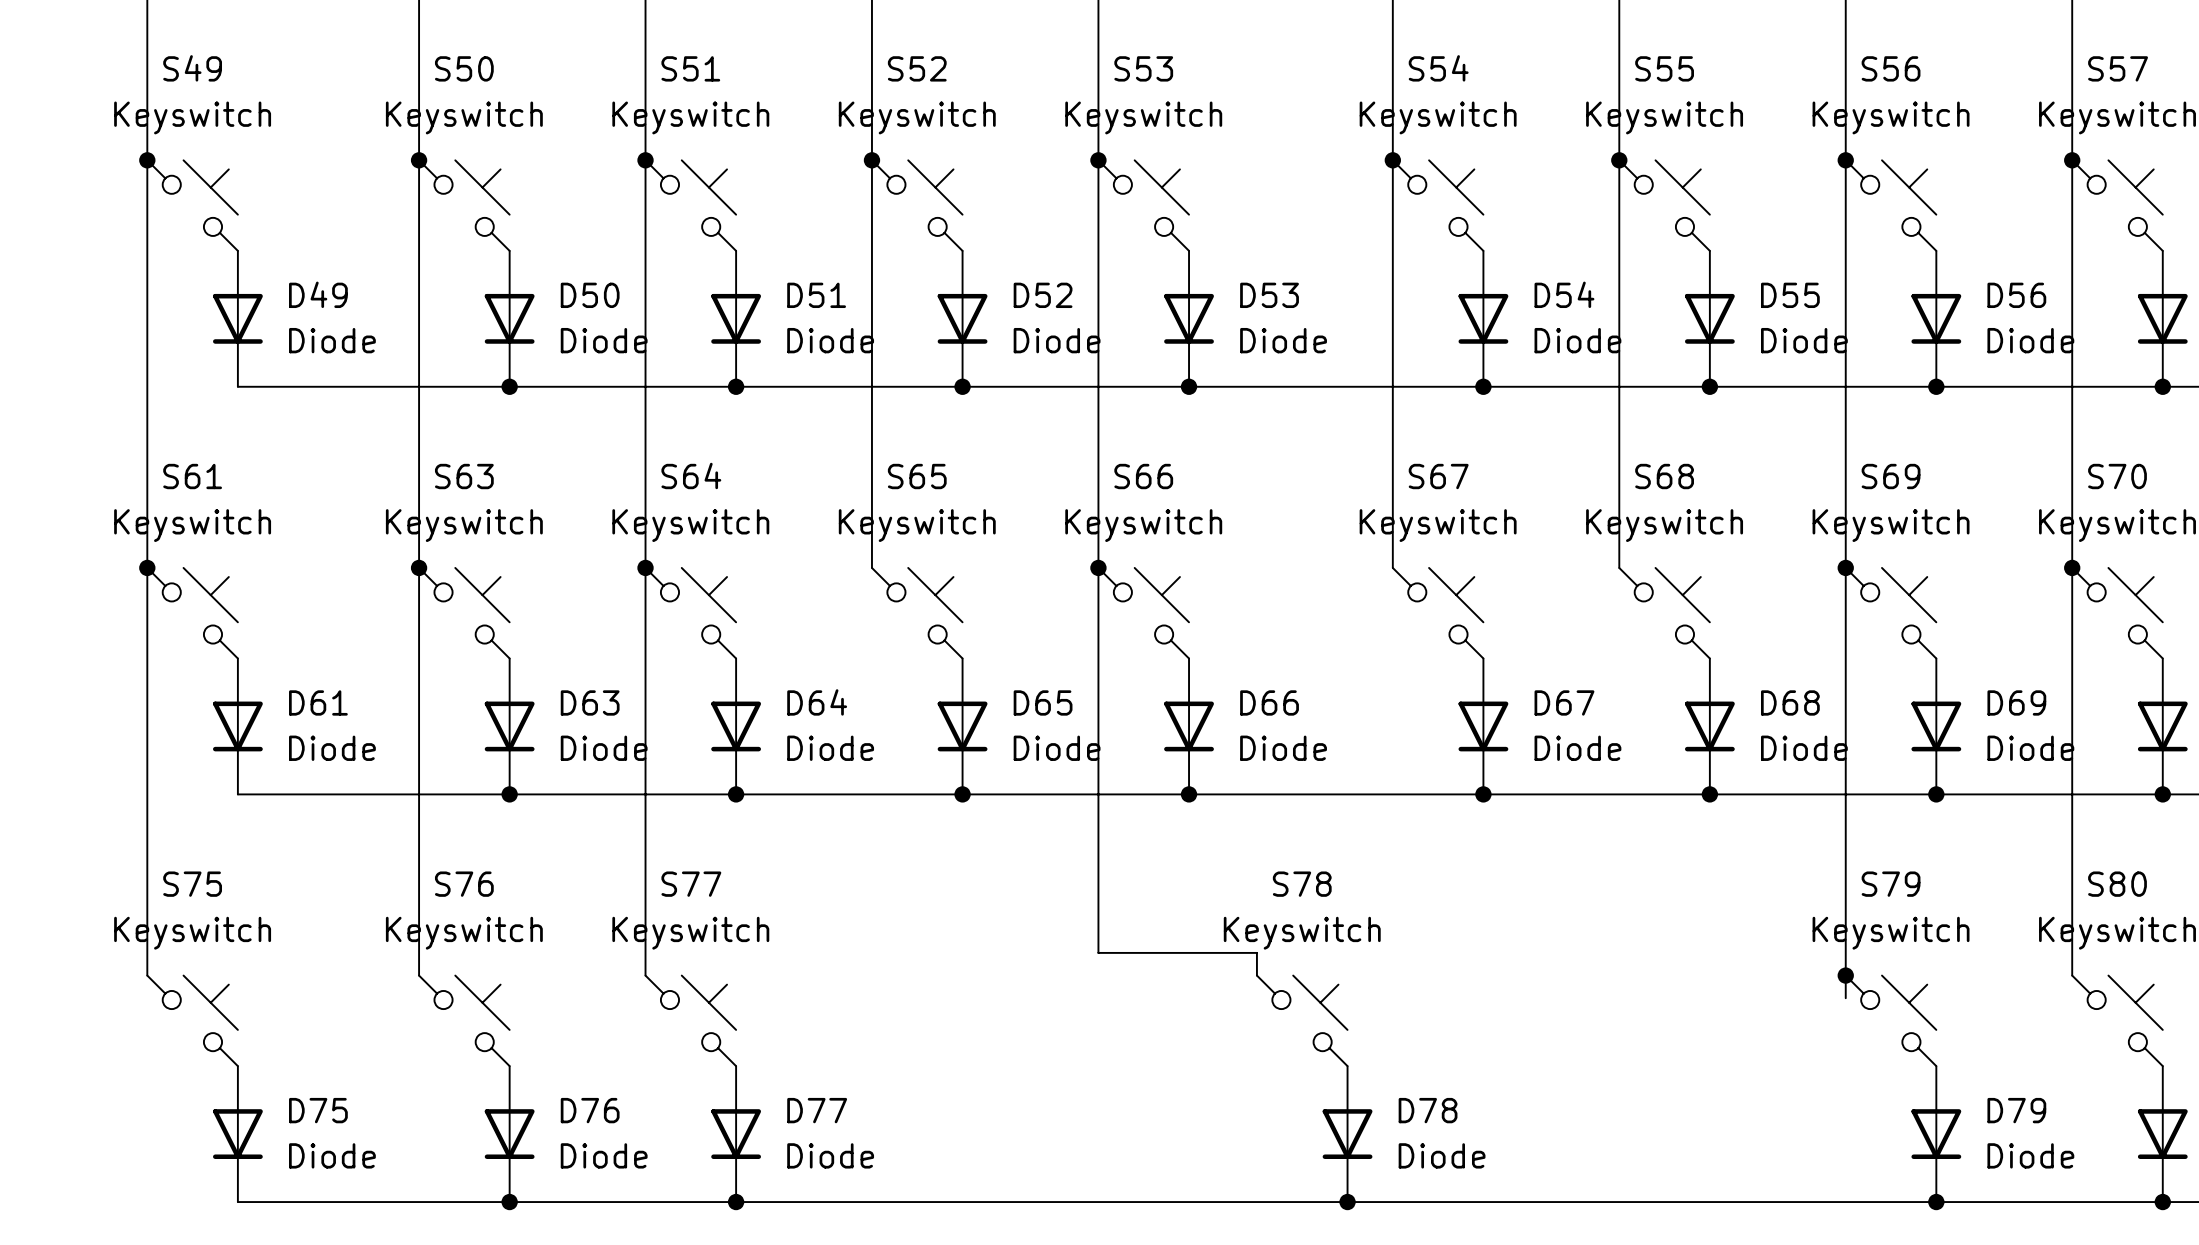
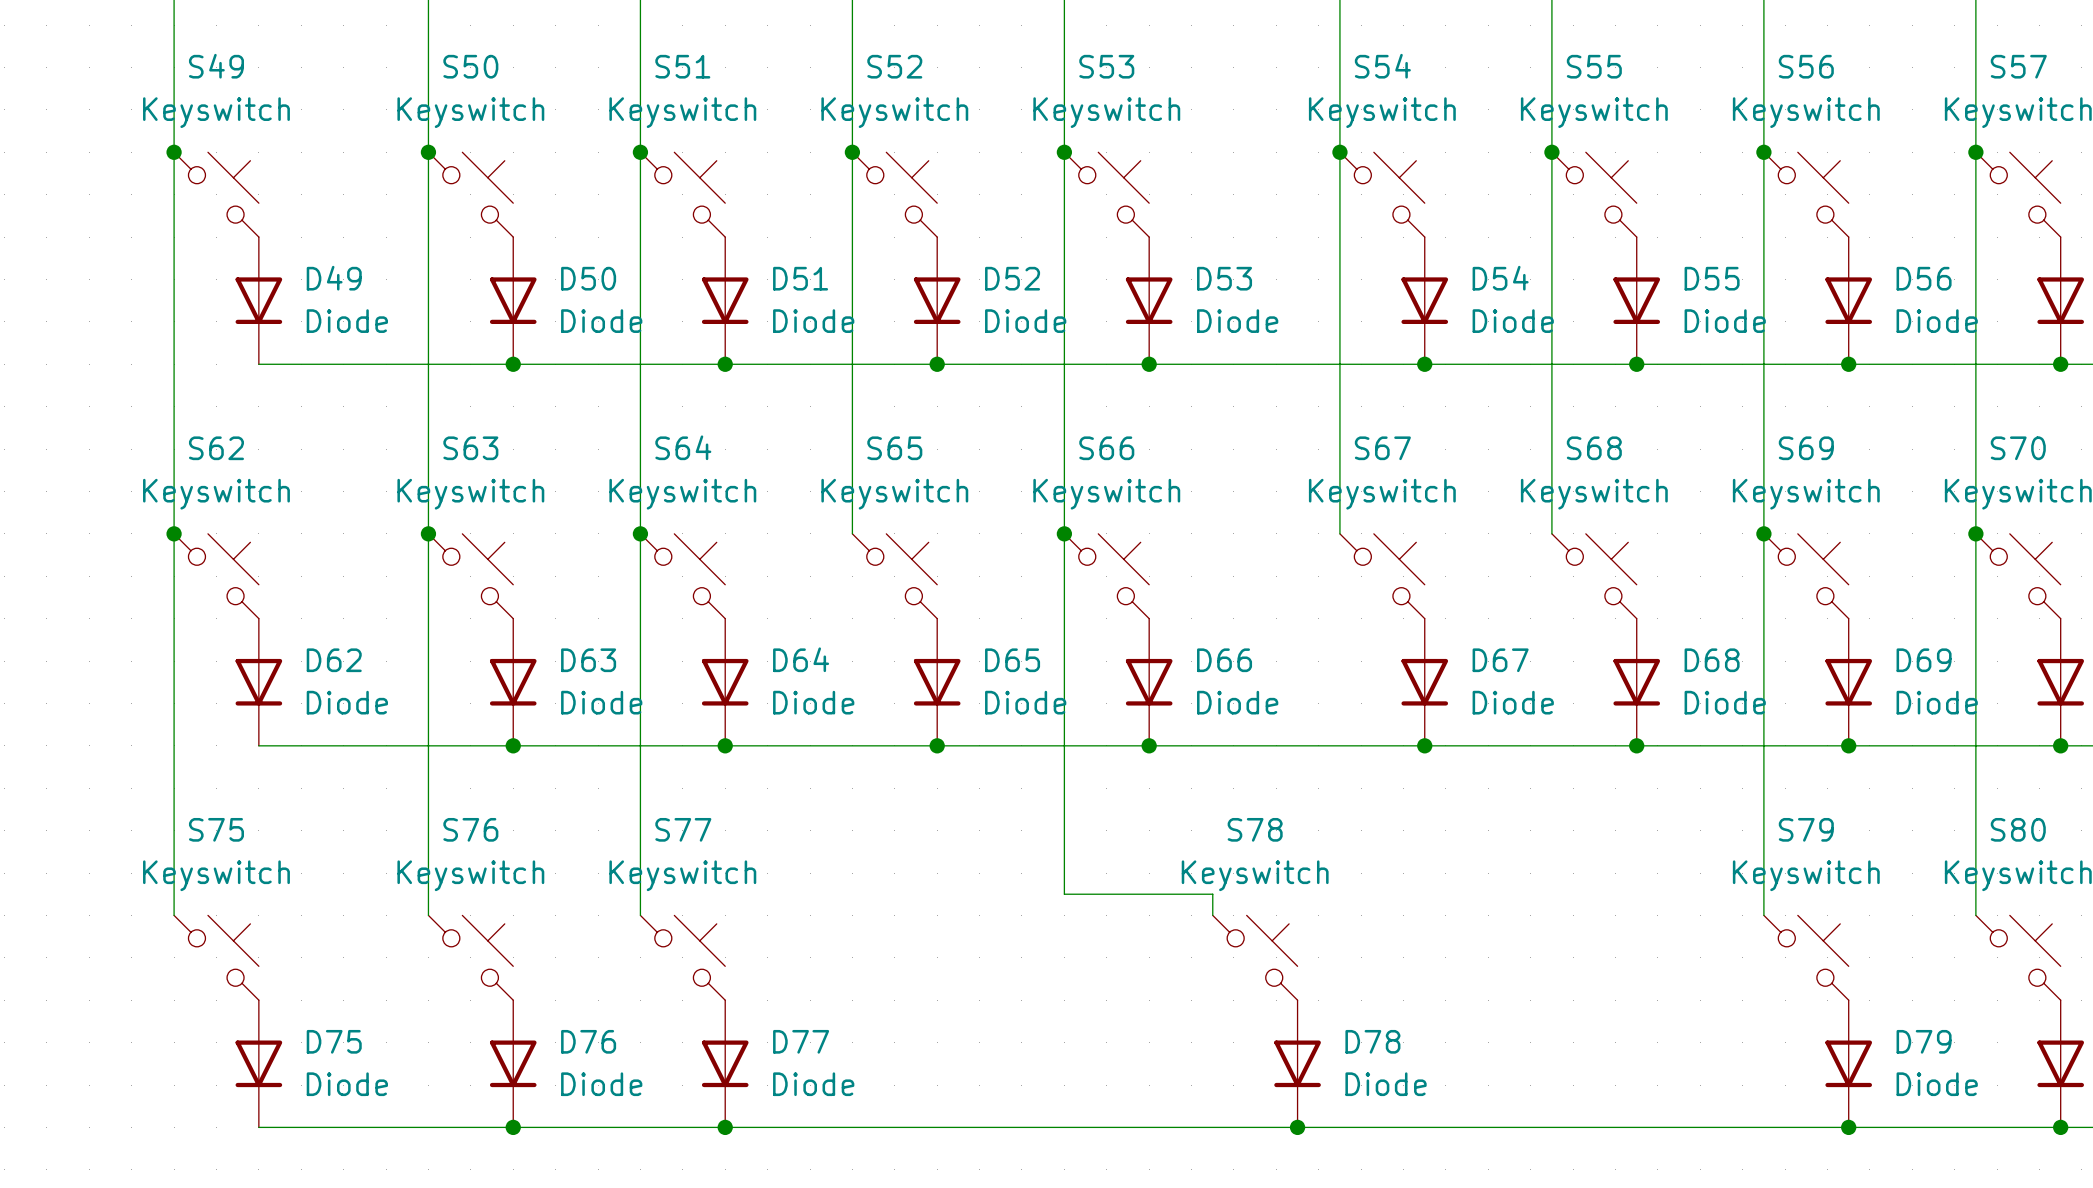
S61 name: S61 (192, 476) -> S62 (216, 448)
D61 name: D61 (318, 702) -> D62 (334, 660)
wire: (1845, 975) (1845, 998) -> none
junction: (1845, 975) -> none

